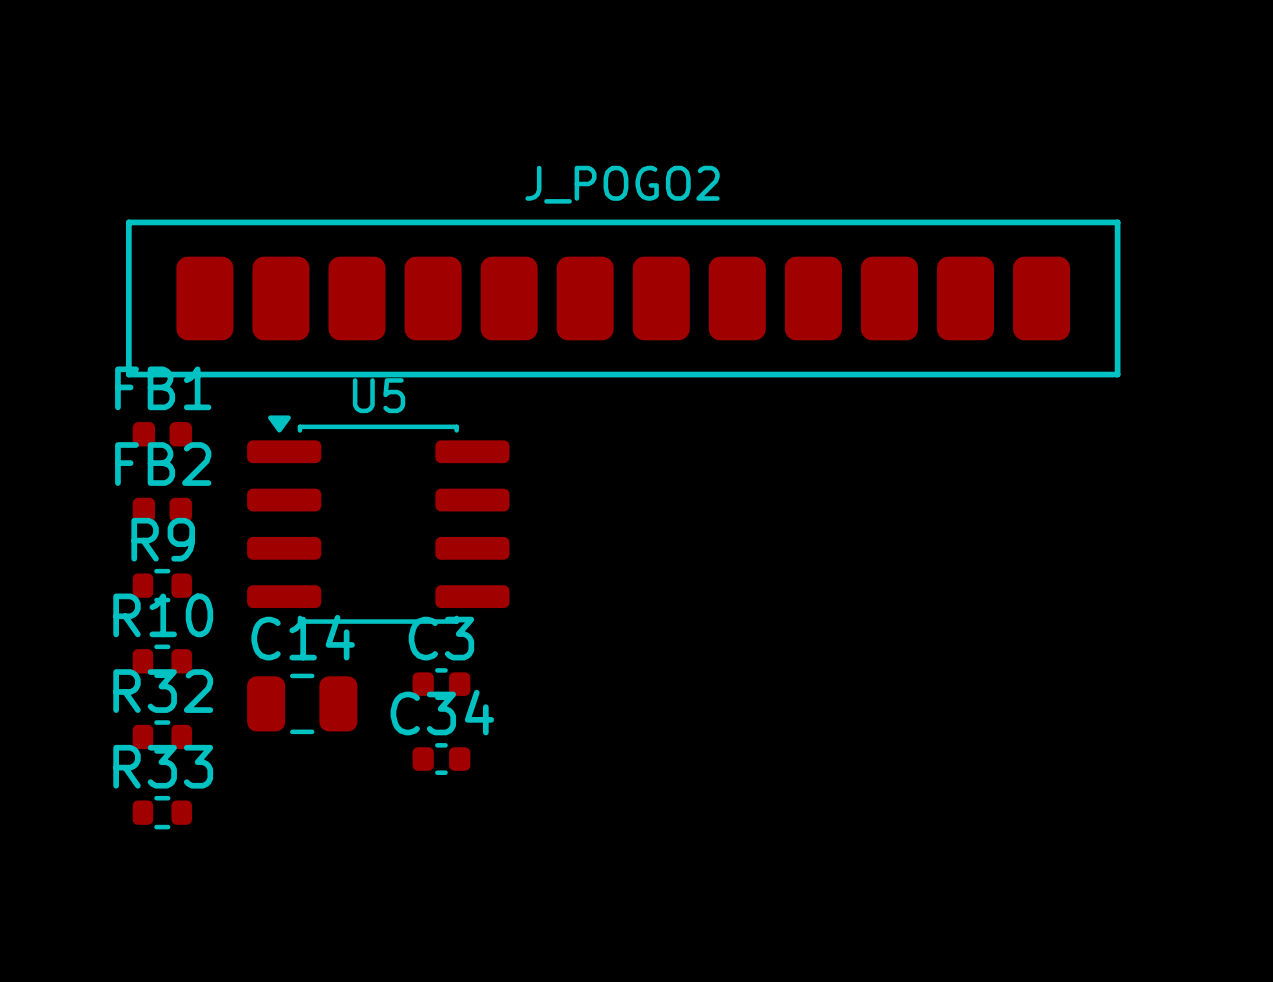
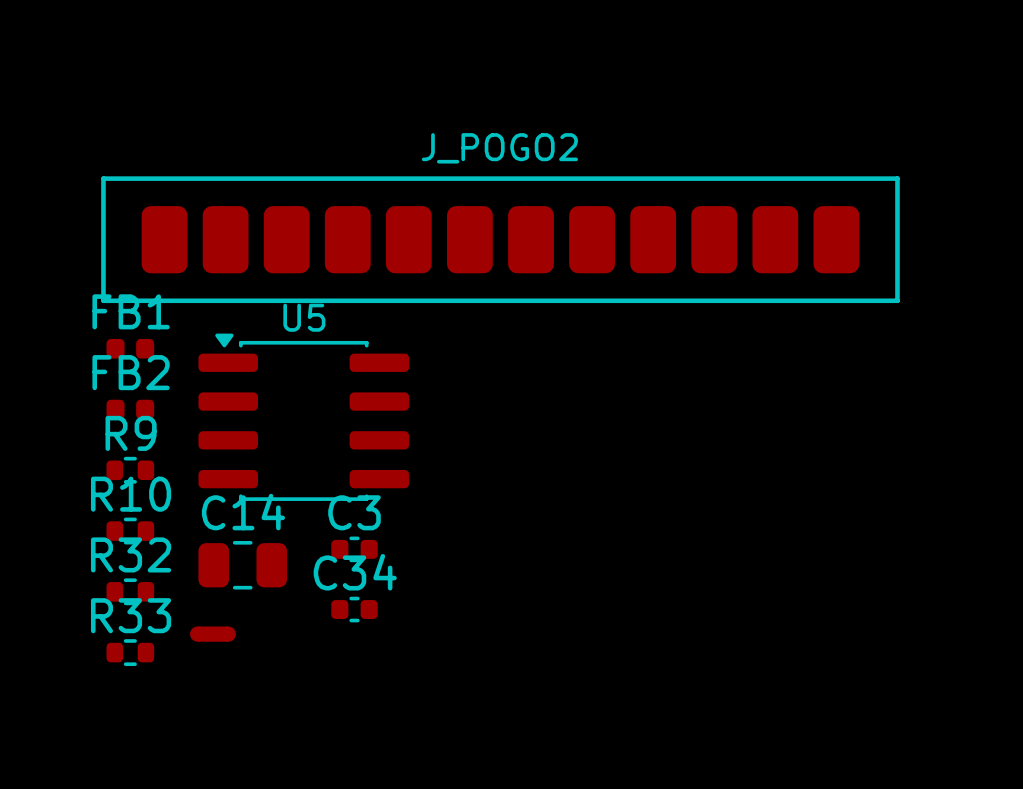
part: none -> (212, 634)

